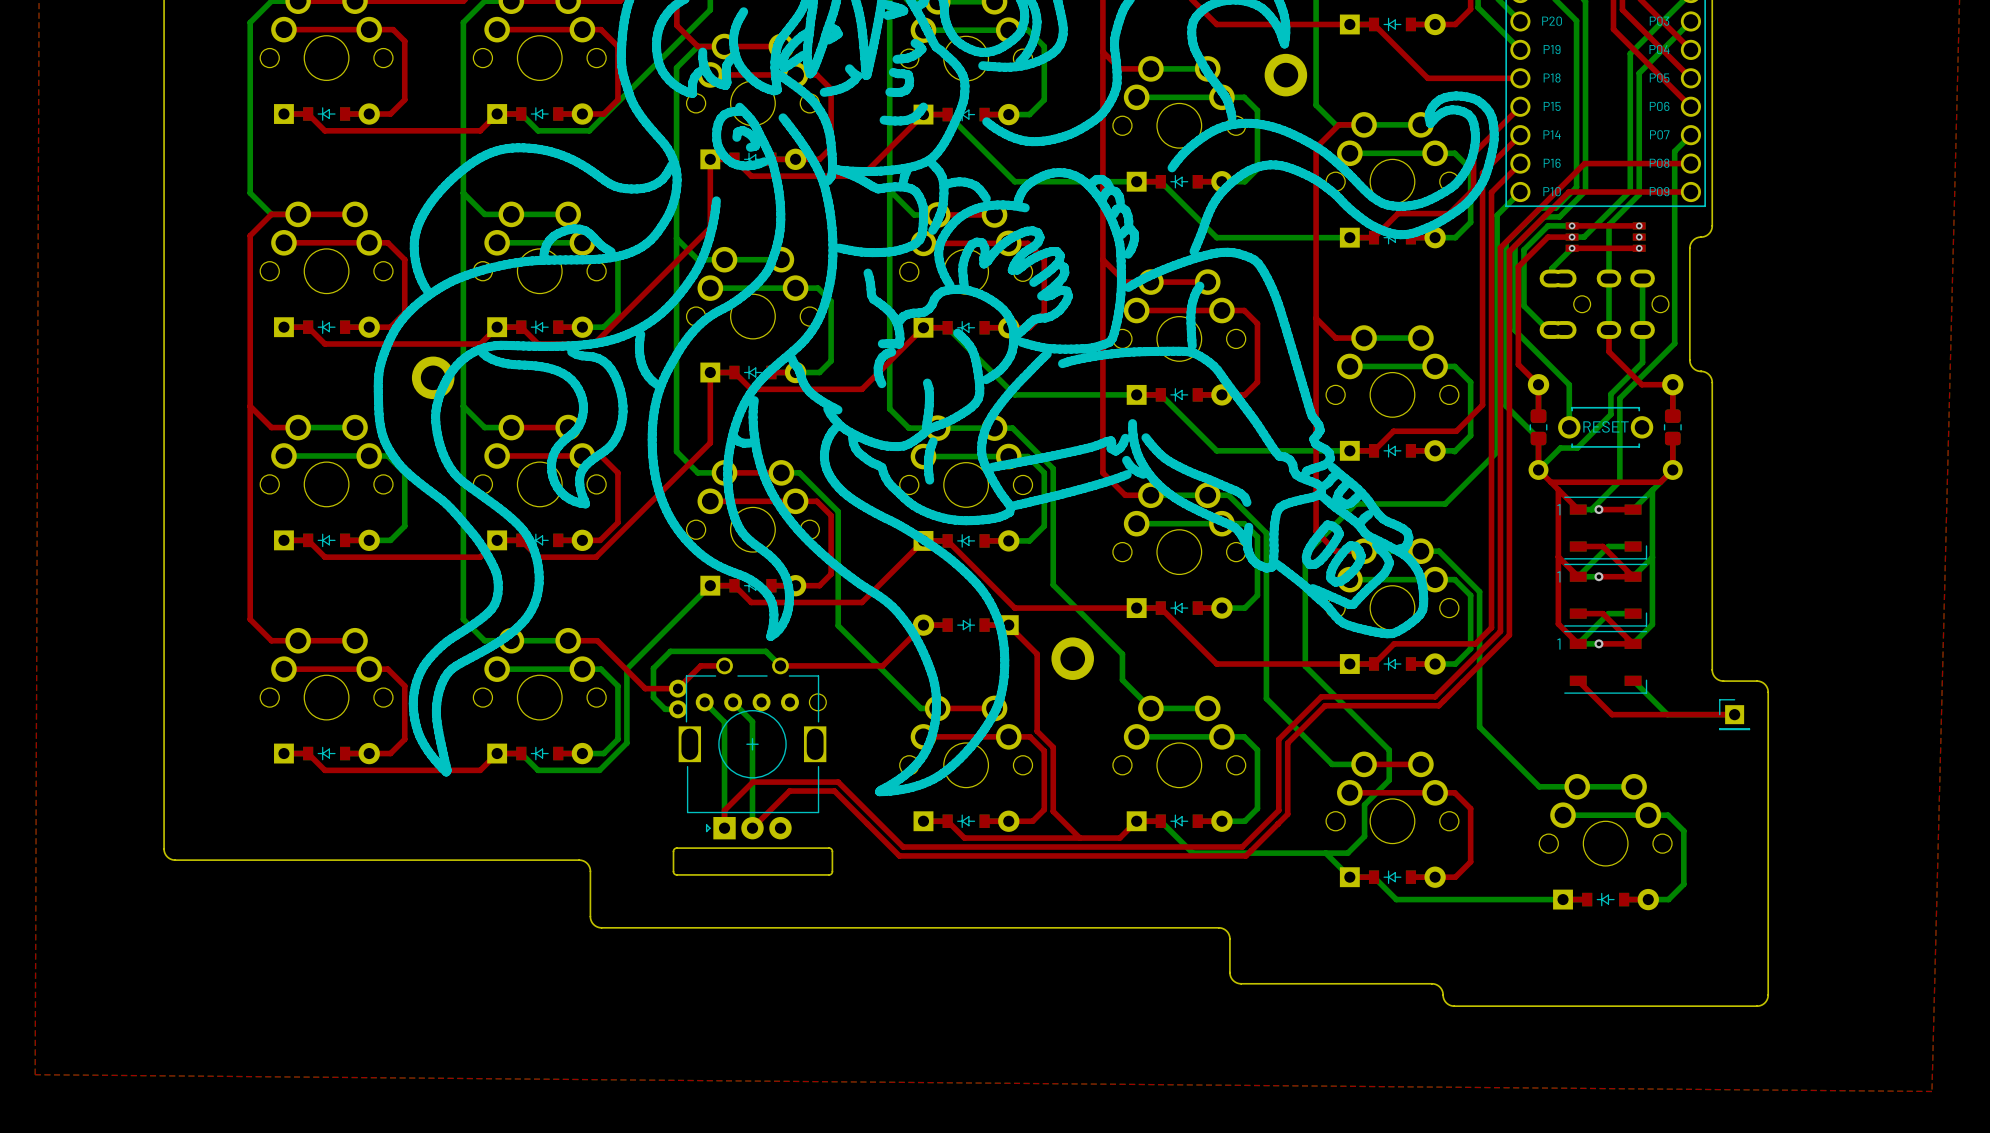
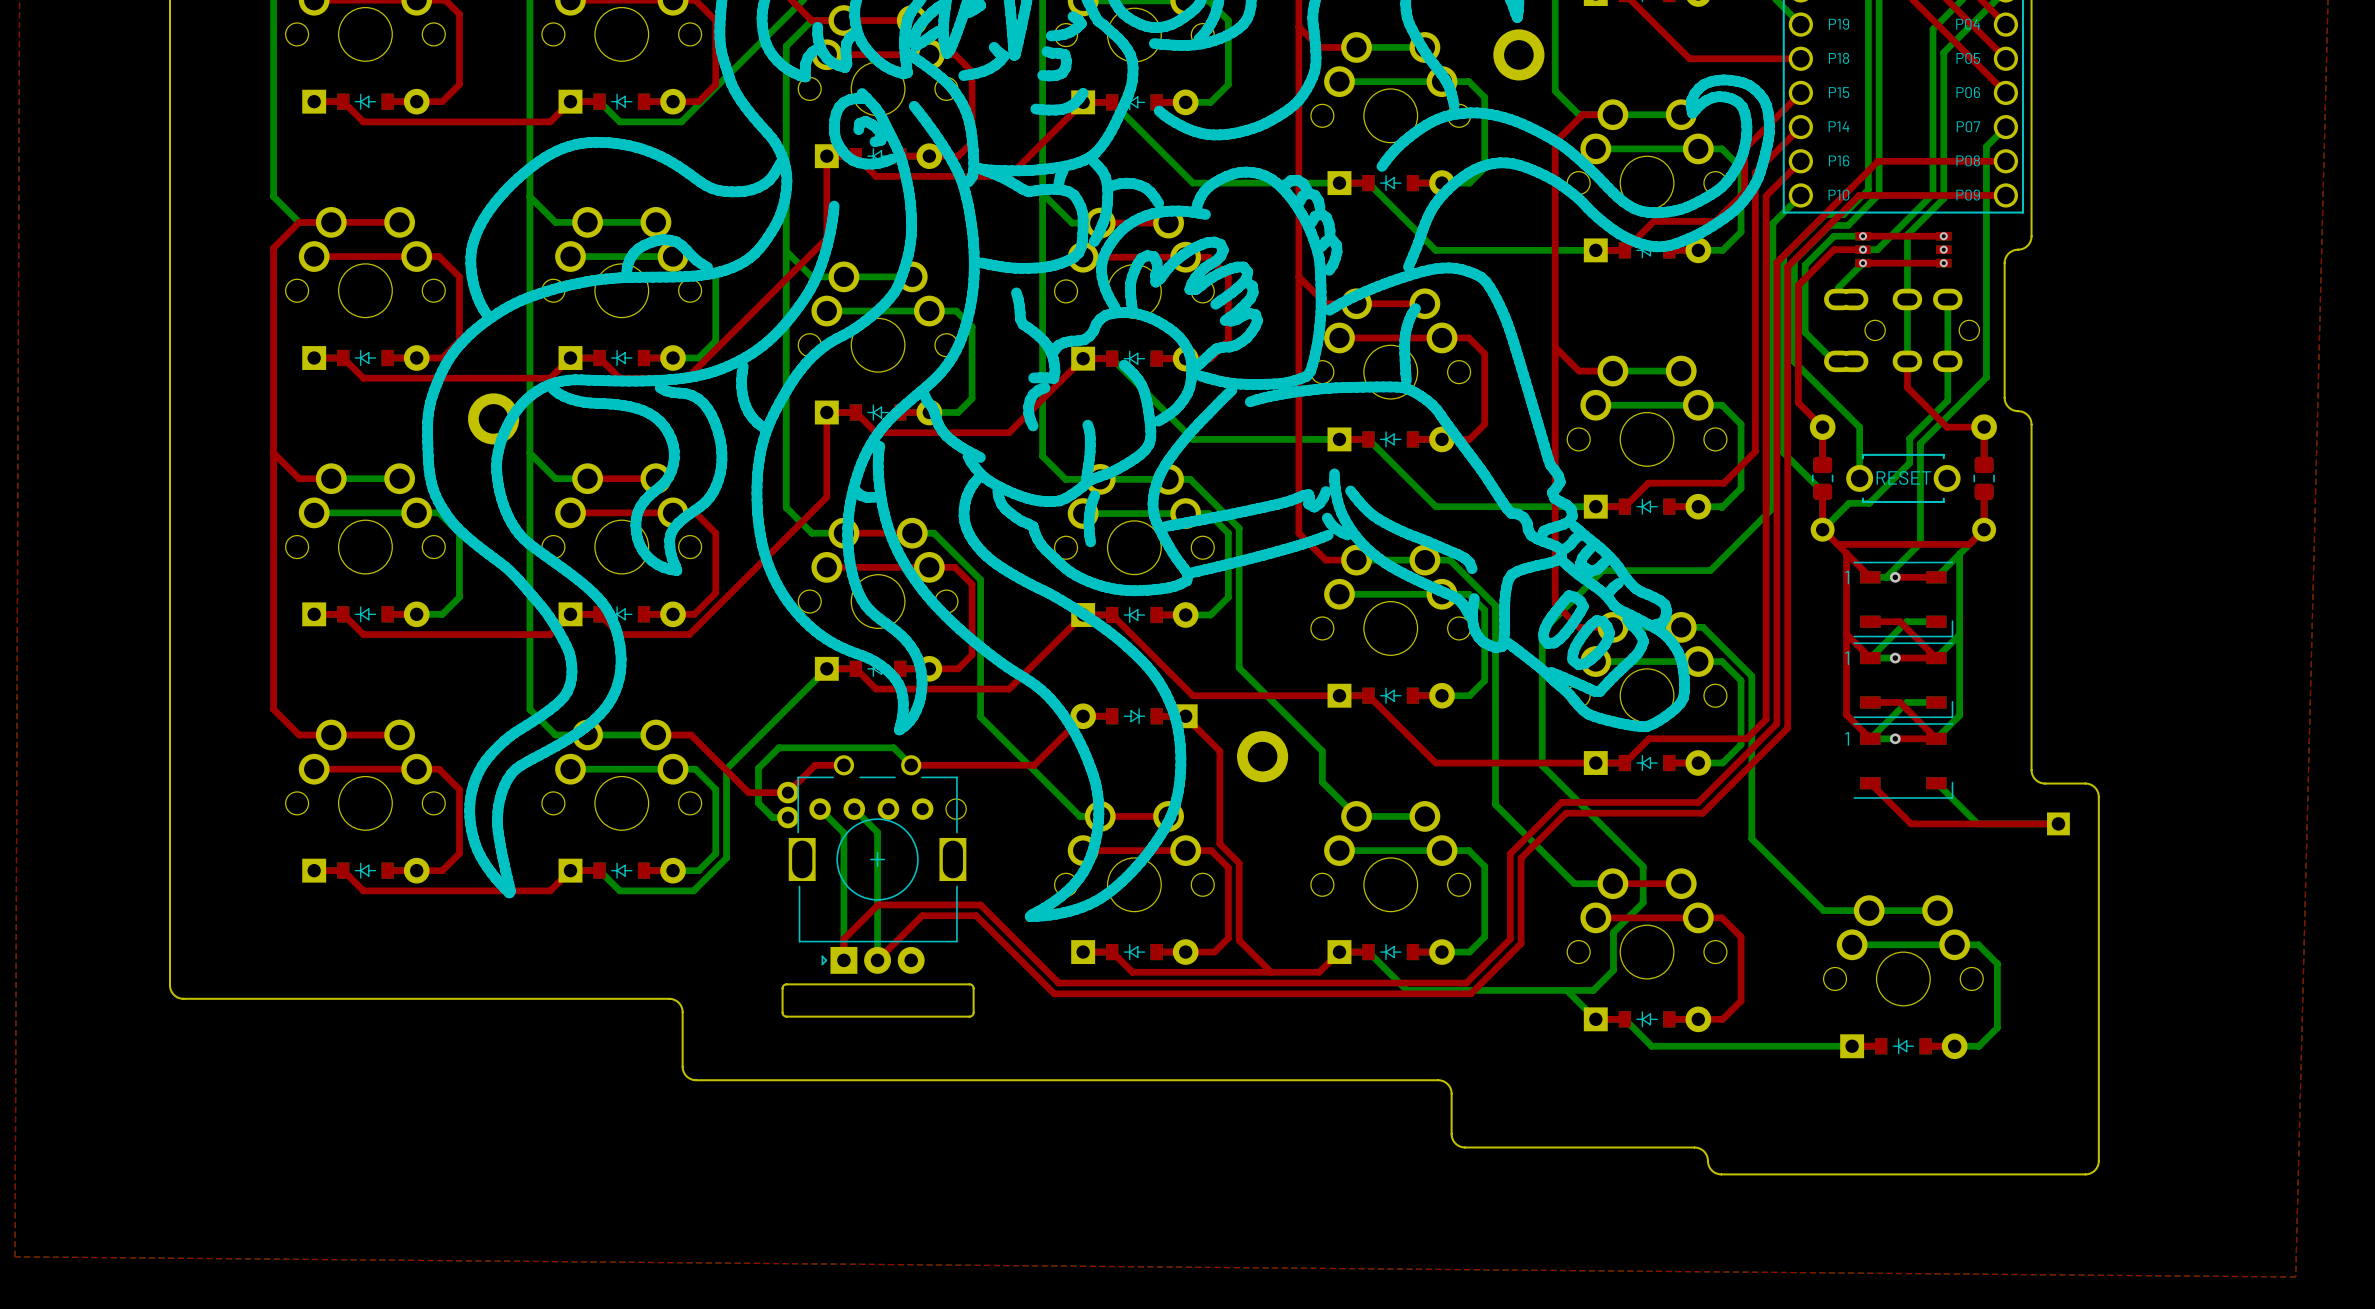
part footprint: [1719, 699, 1751, 731] -> [2047, 812, 2070, 836]

